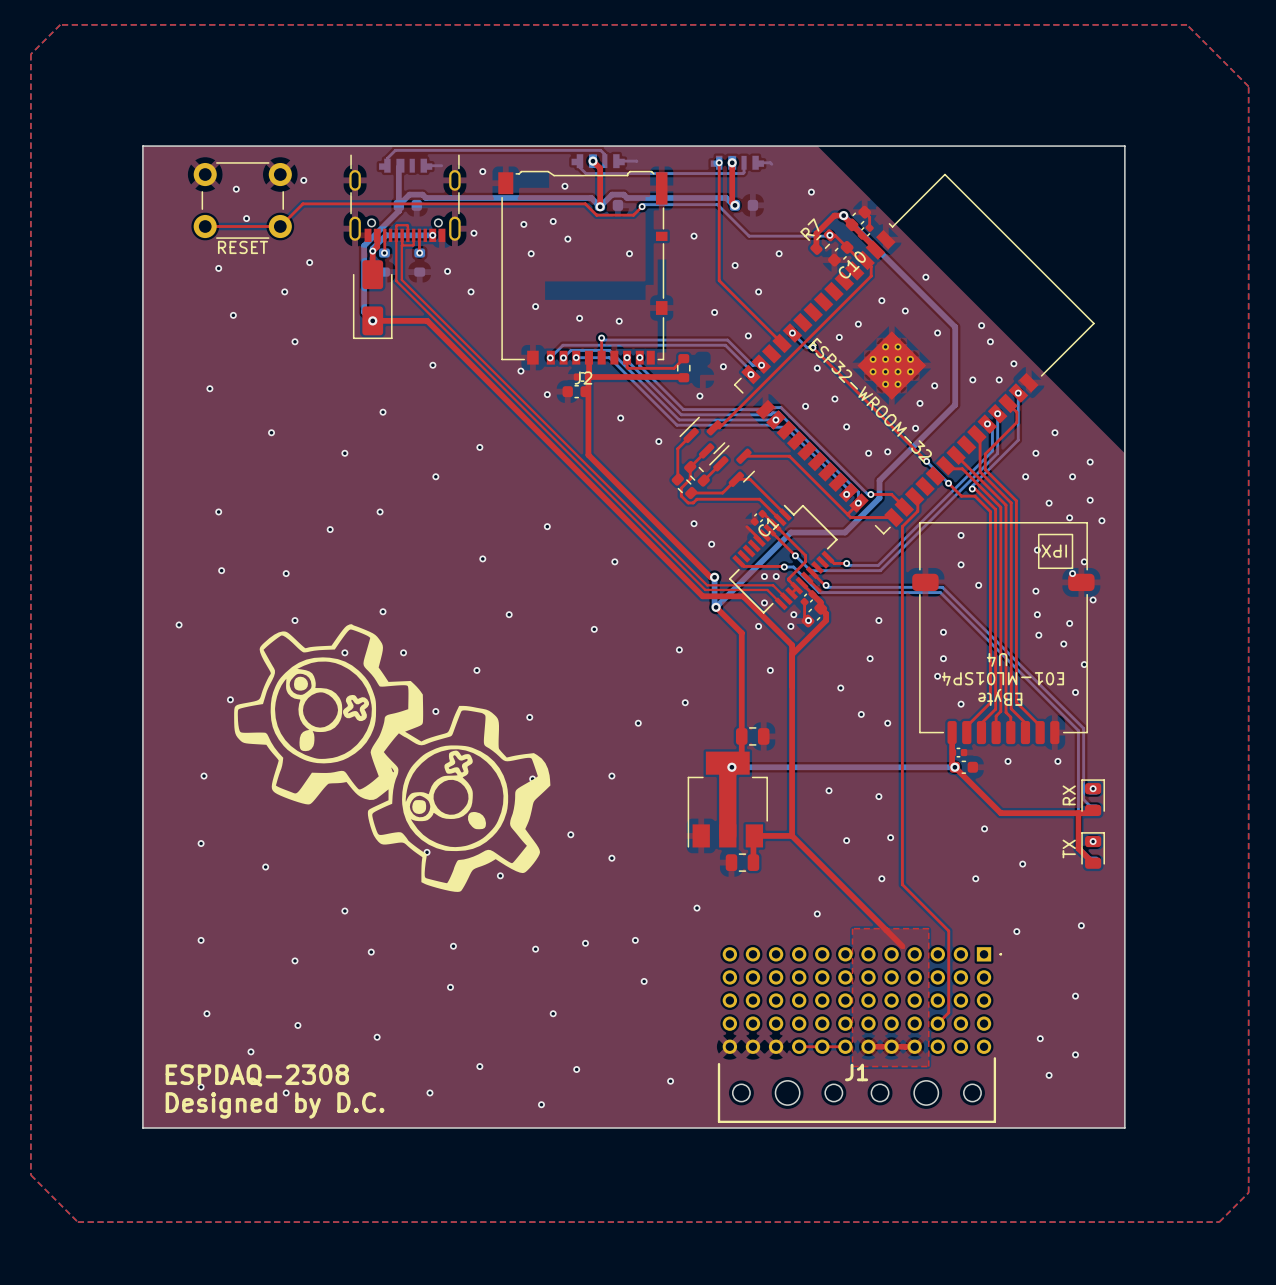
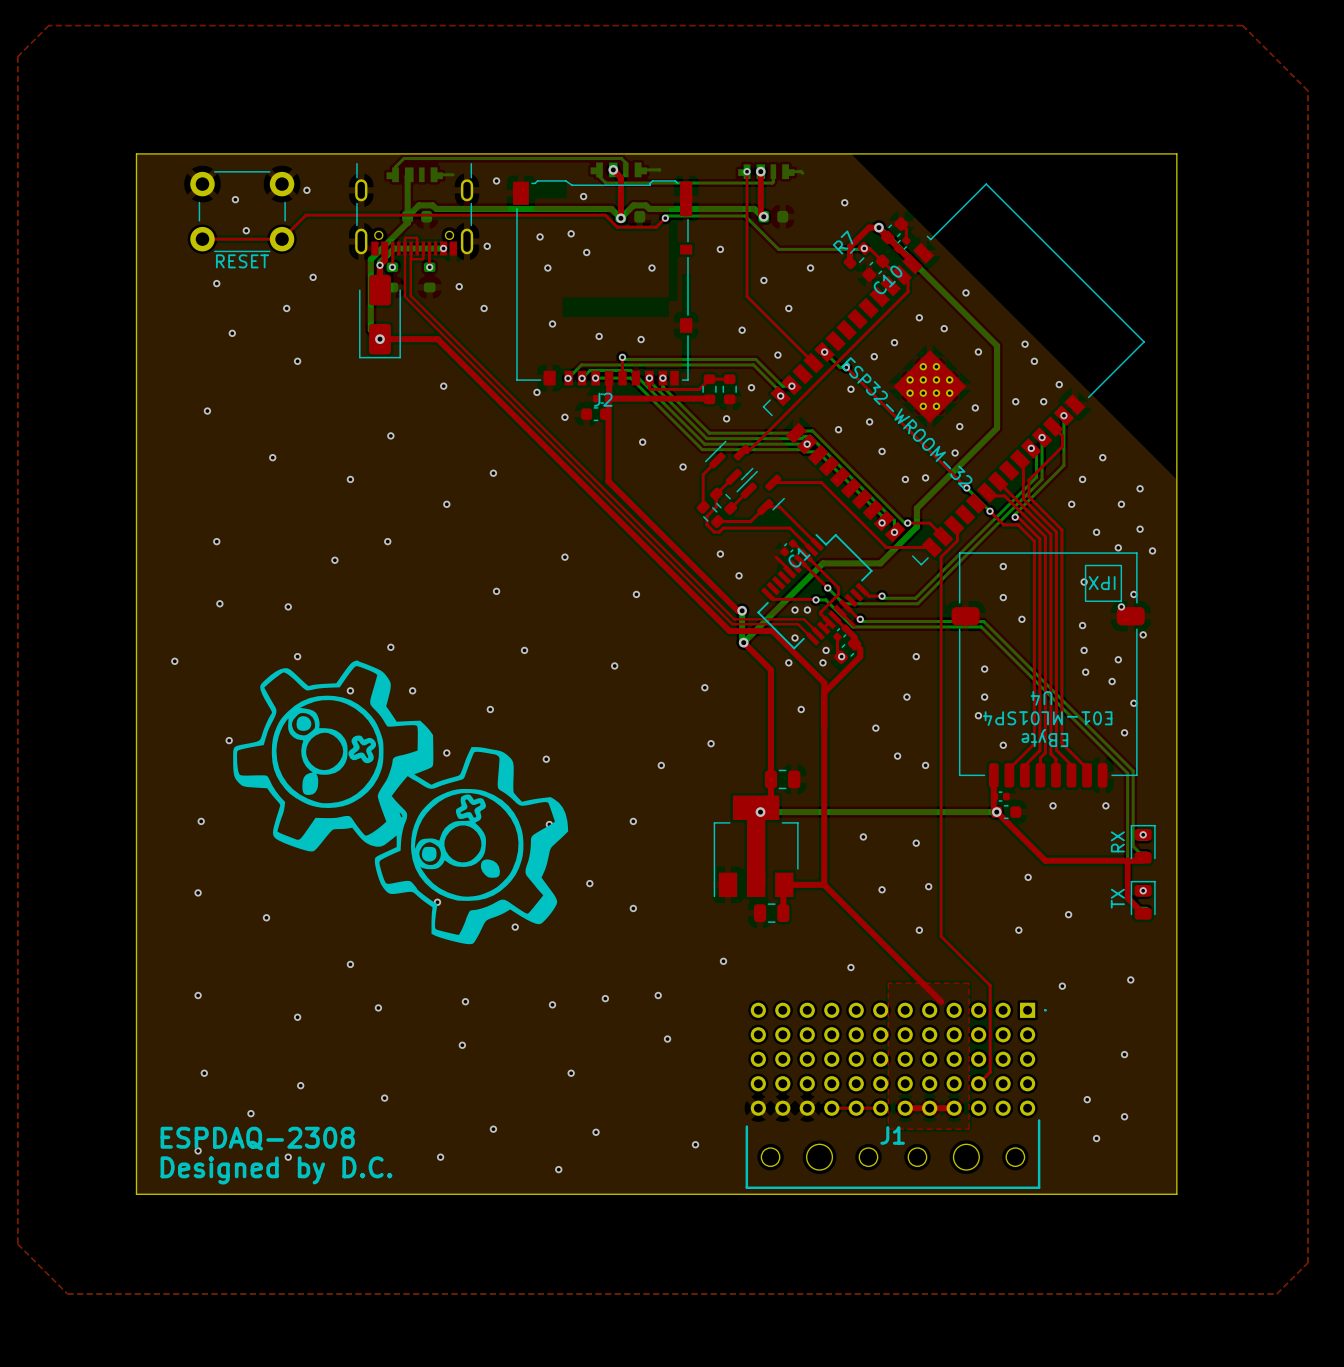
top track: none -> (709, 379) (729, 379)
part: none -> (729, 389)
top track: (858, 502) (848, 514) -> none

